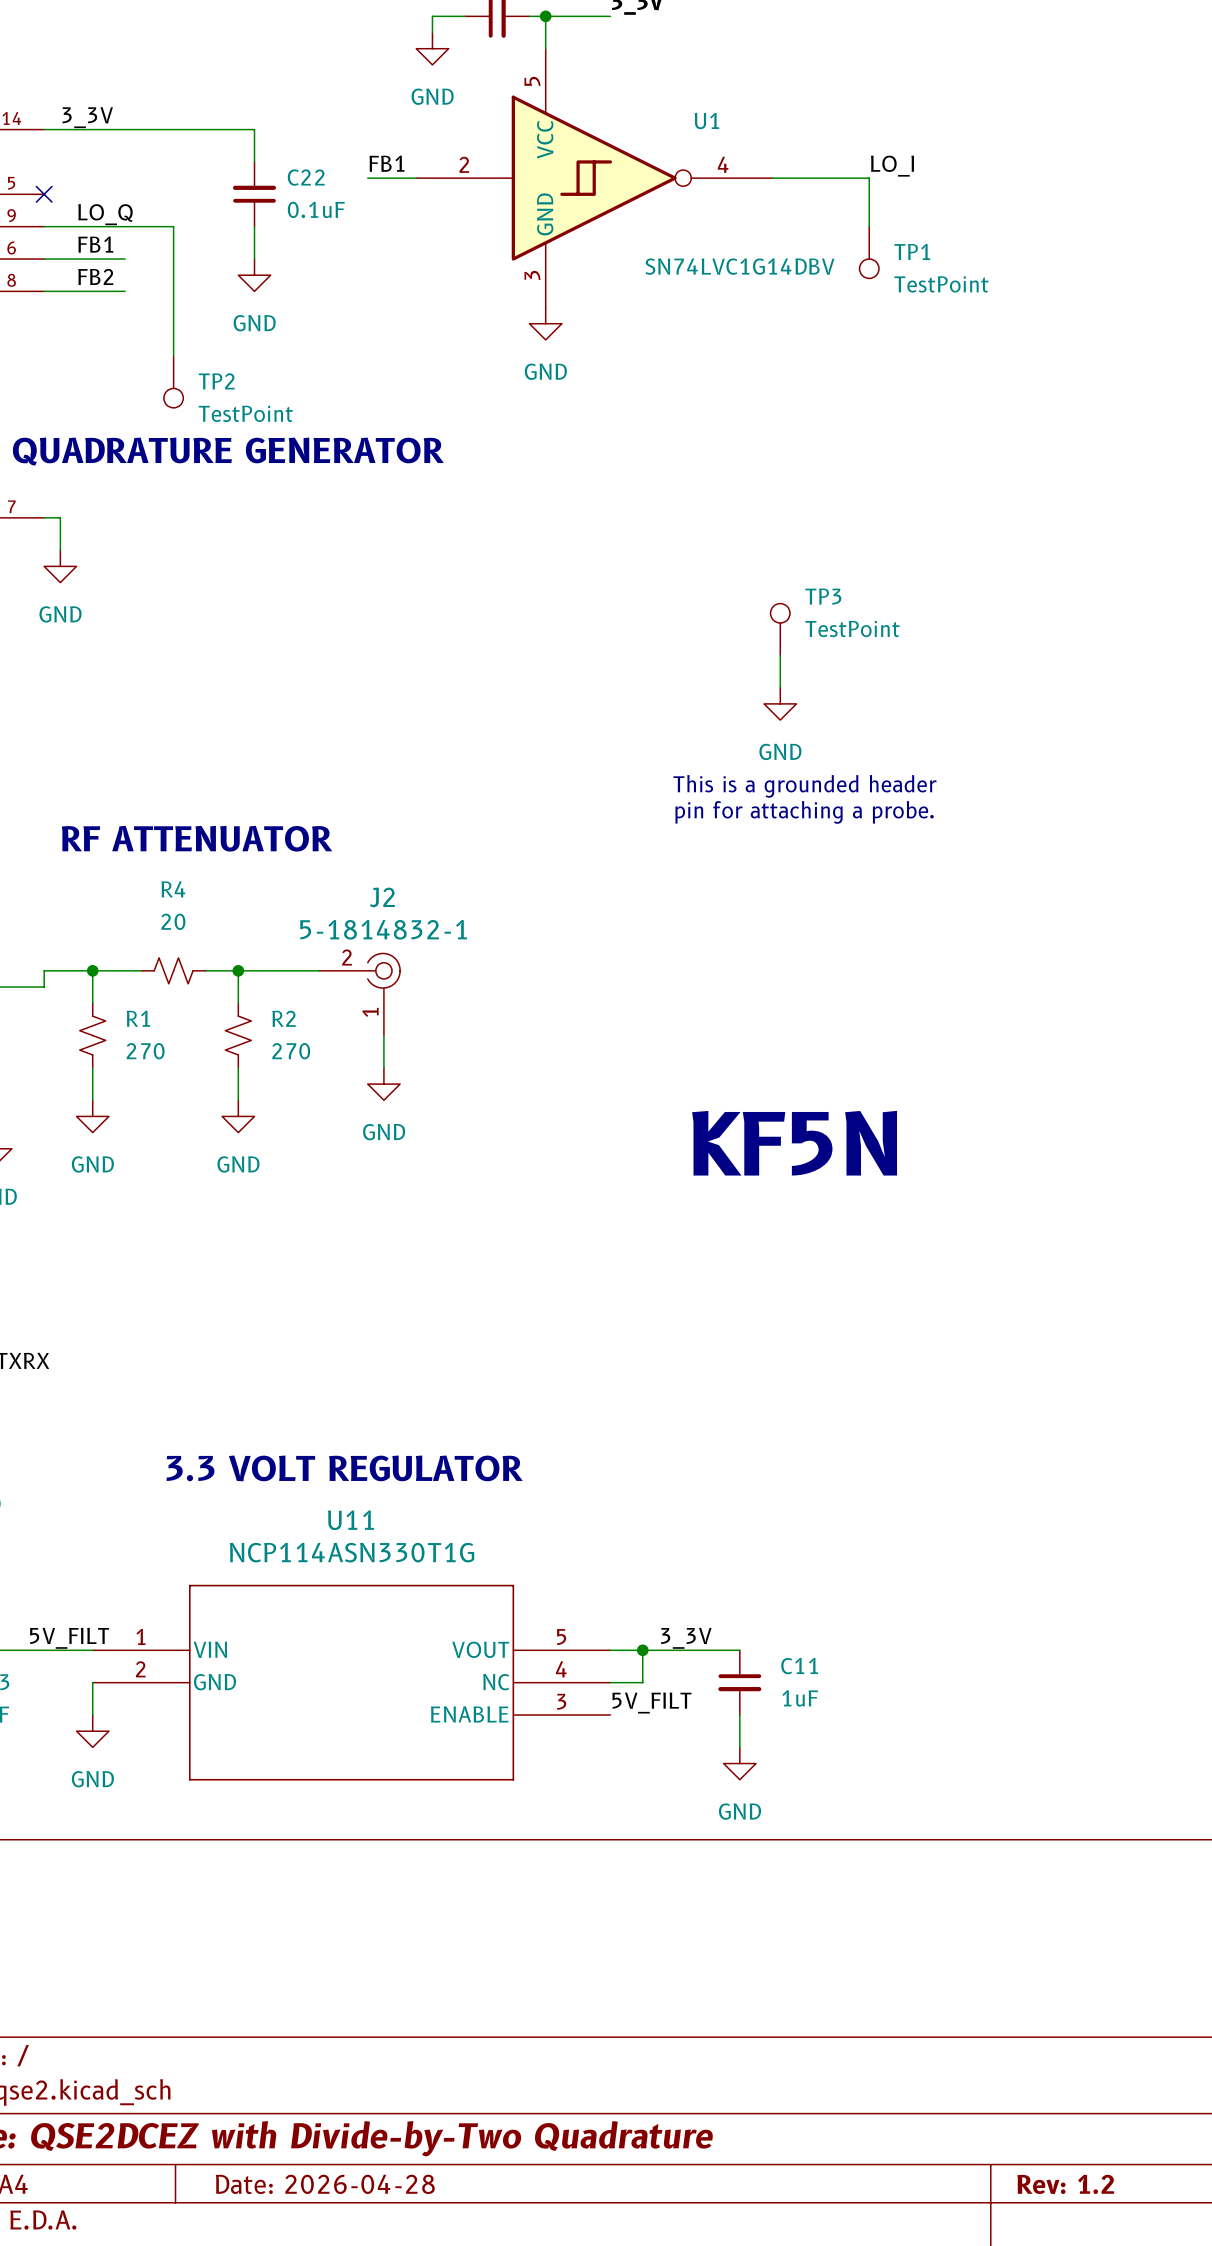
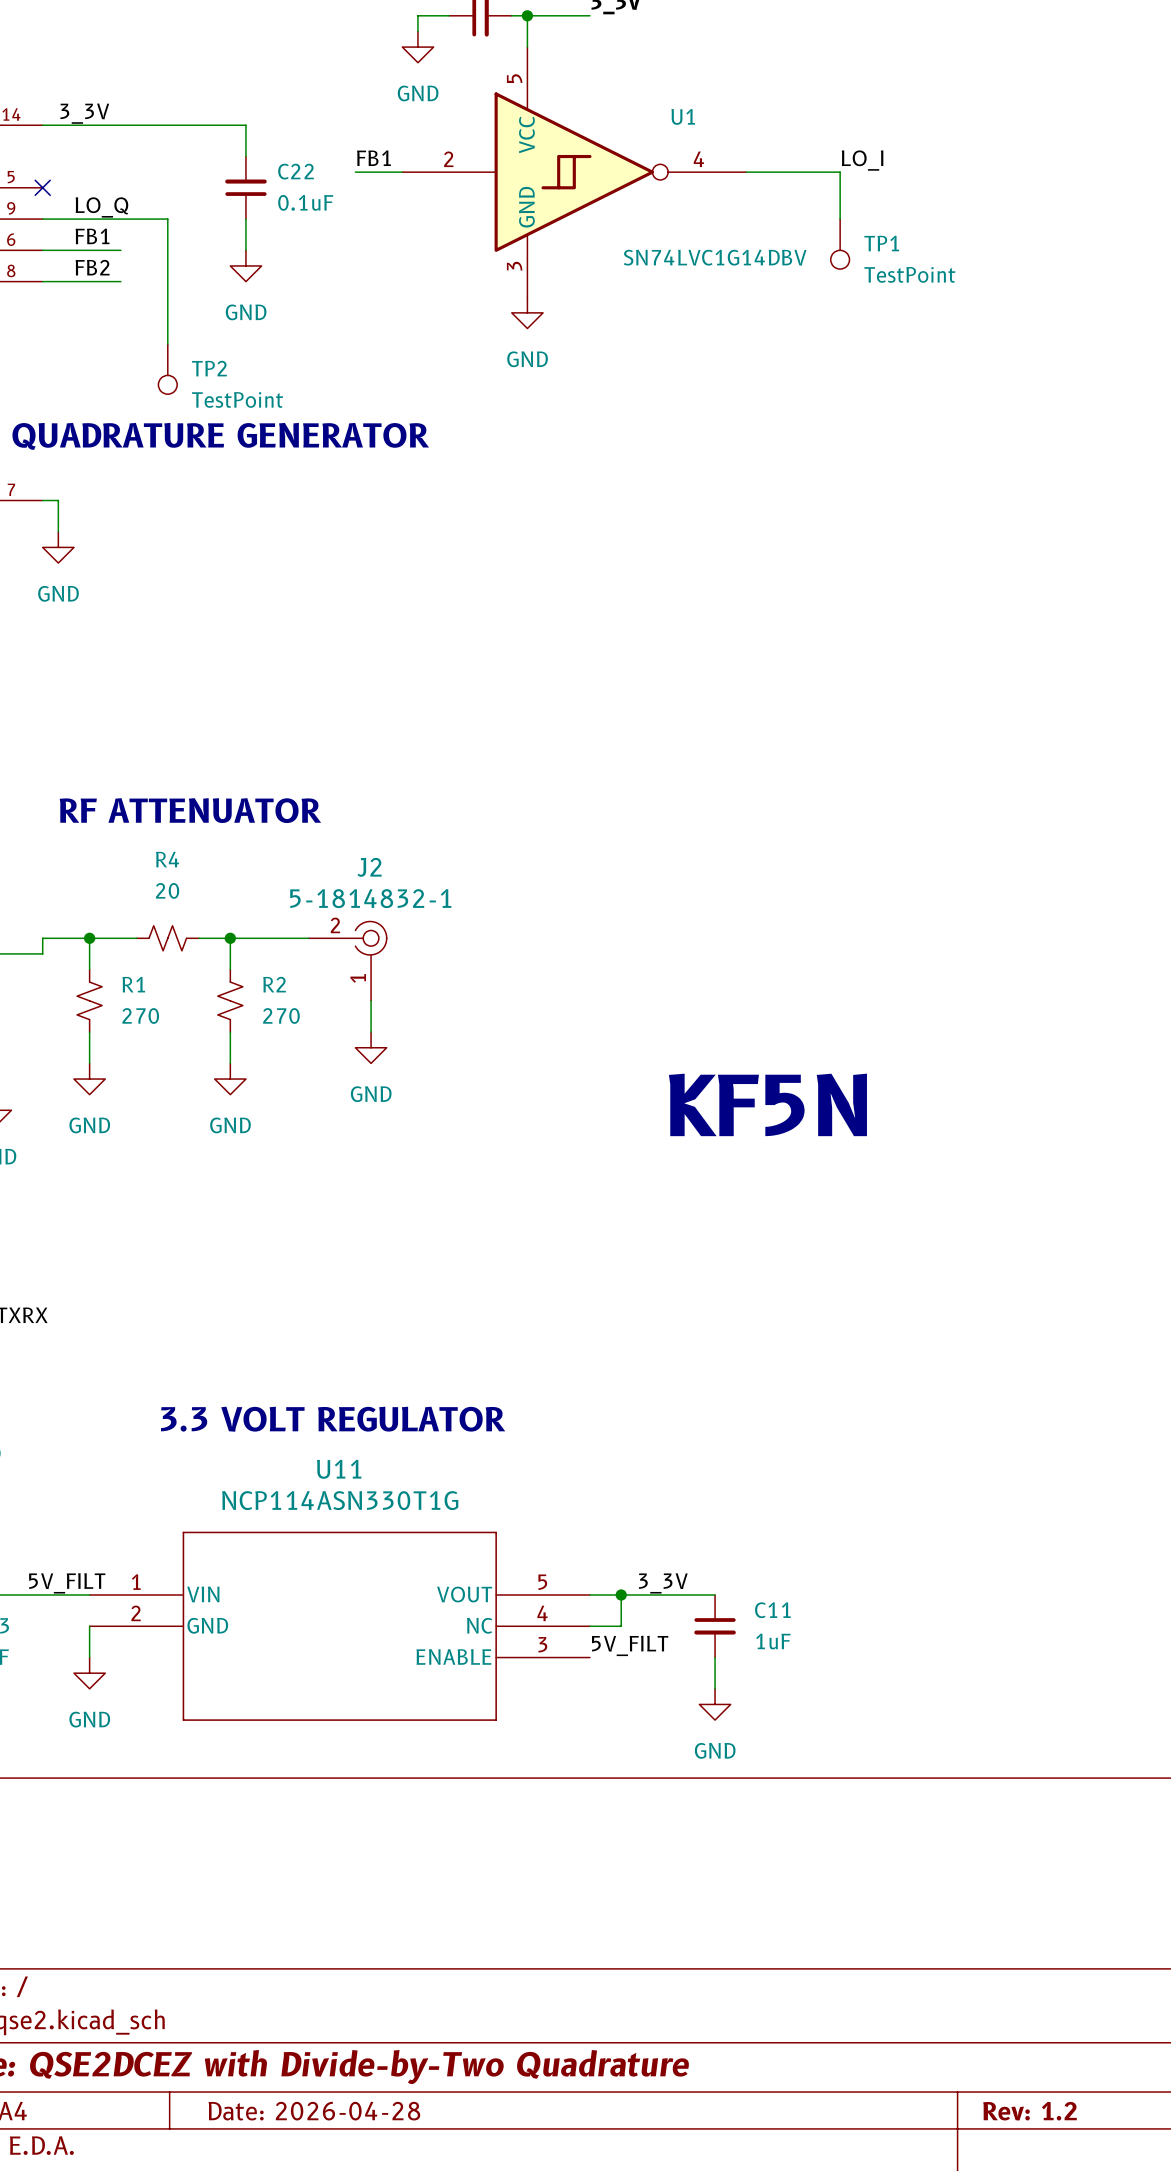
TP3: TestPoint (780, 629) -> none
wire: (780, 655) (780, 687) -> none
power symbol: GND (780, 703) -> none
text: This is a grounded header (804, 786) -> none
text: pin for attaching a probe. (804, 812) -> none

